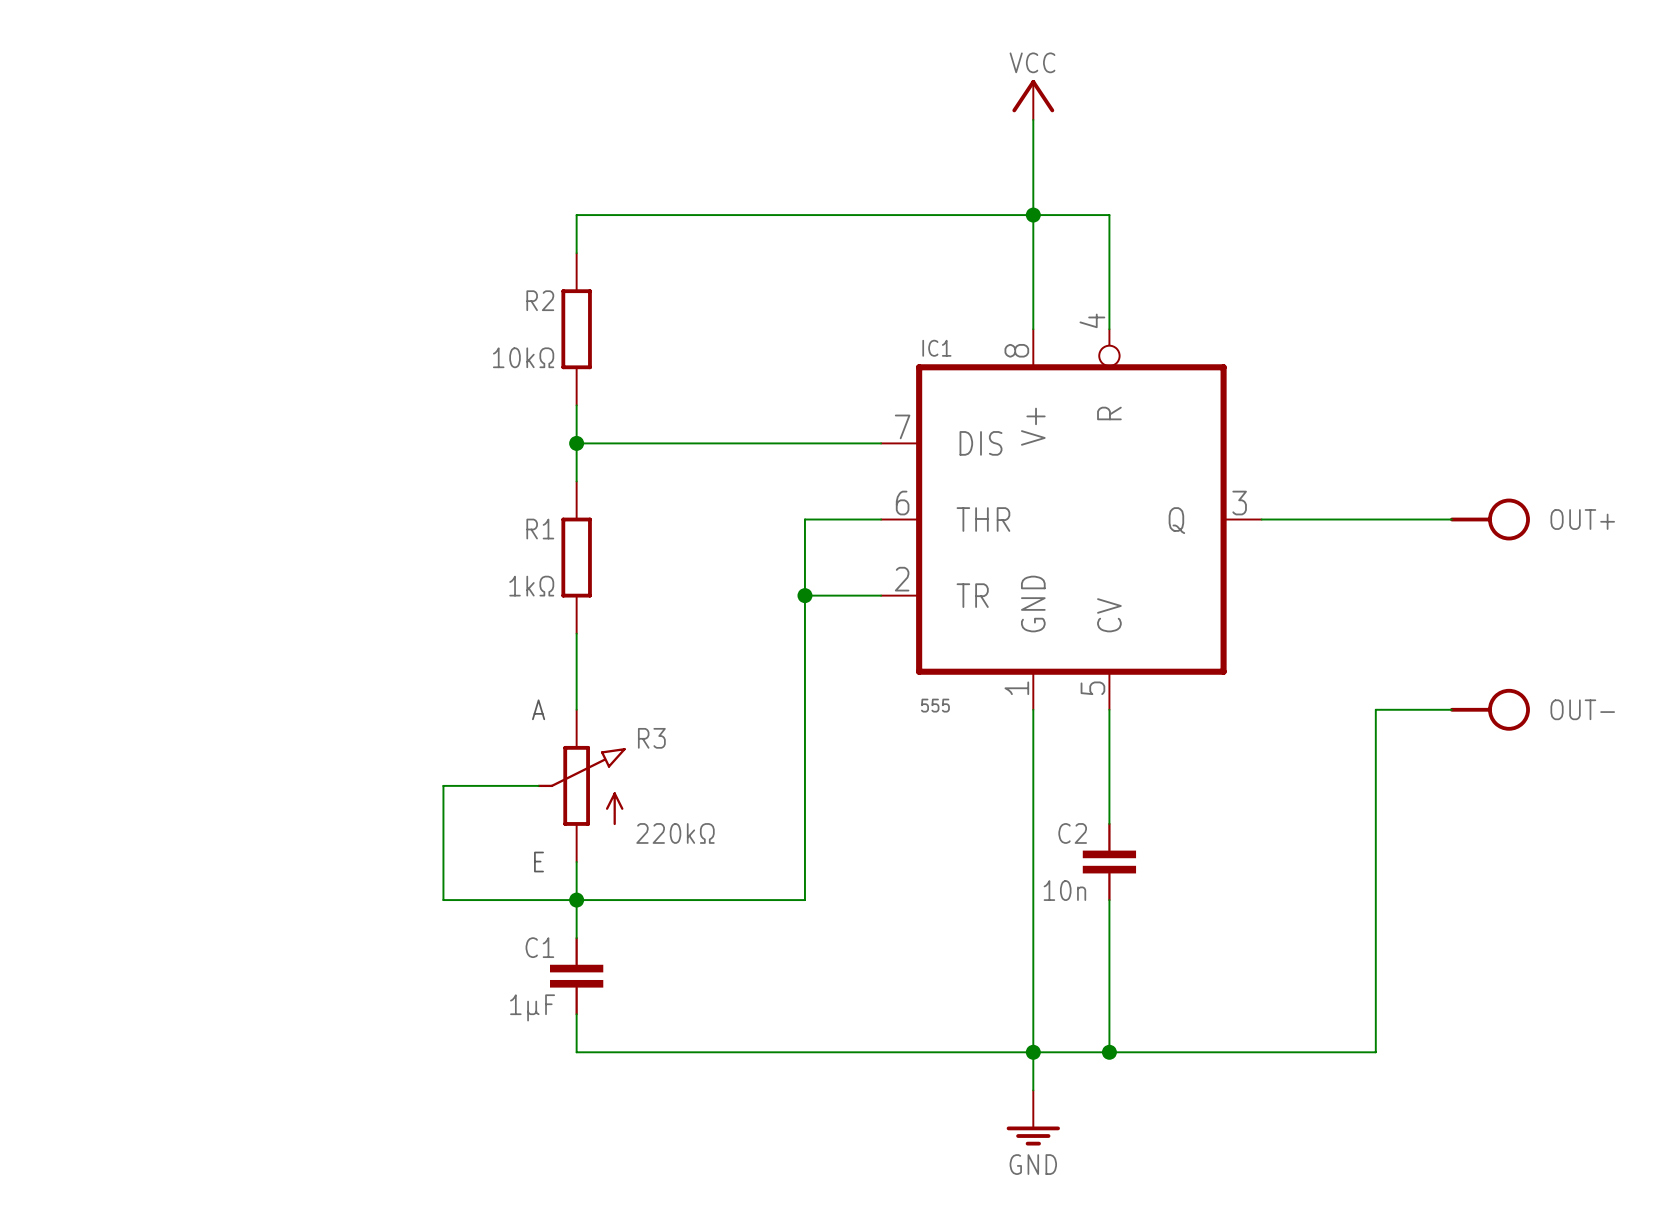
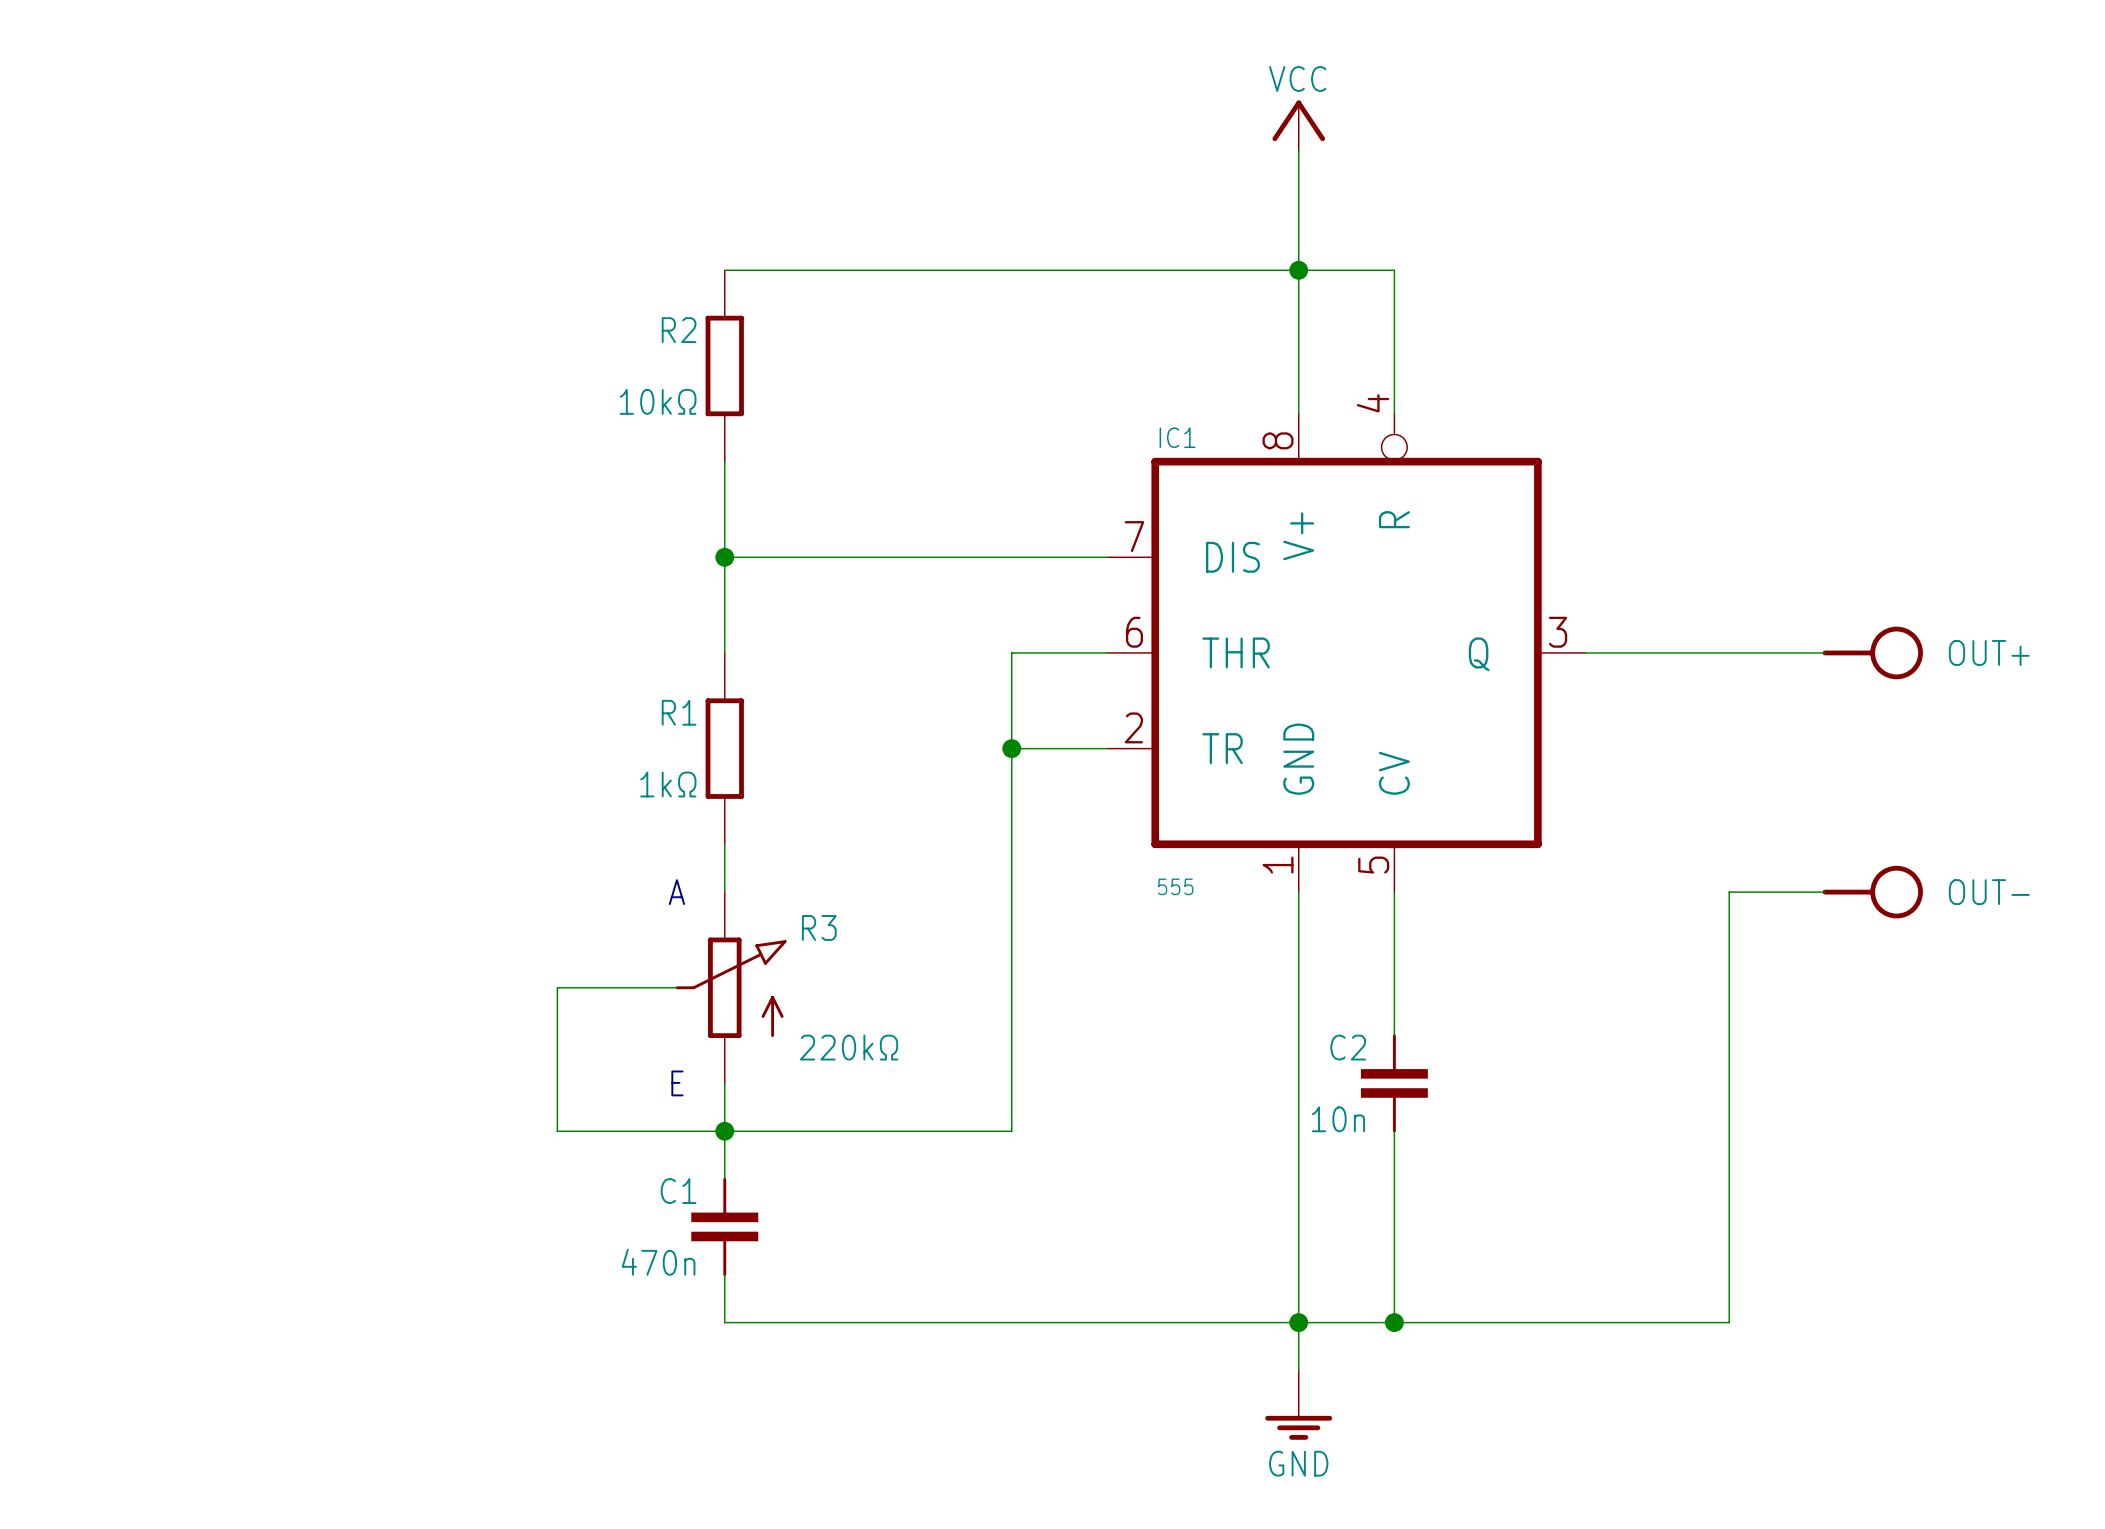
R2 position: (576, 329) -> (724, 365)
R1 position: (576, 557) -> (724, 748)
C1 value: 1μF (532, 1007) -> 470n (658, 1262)

